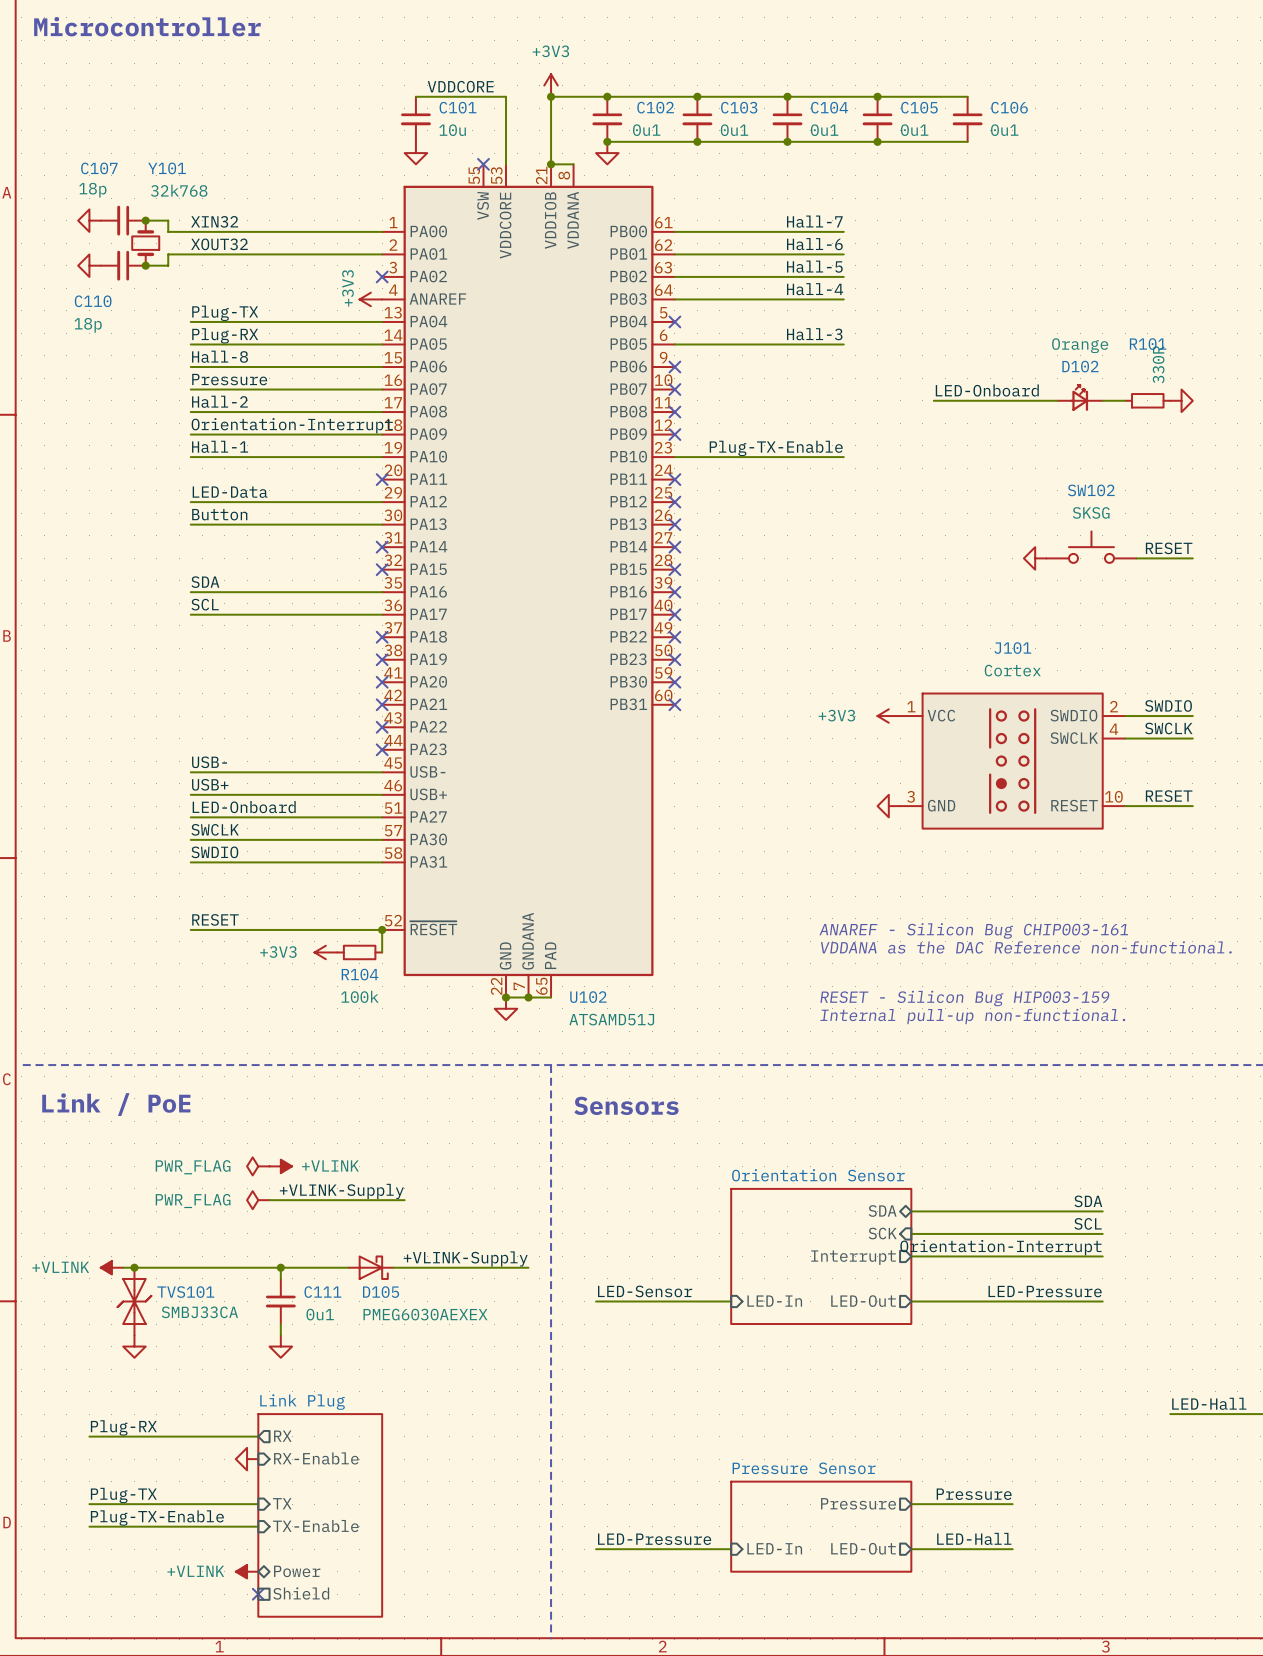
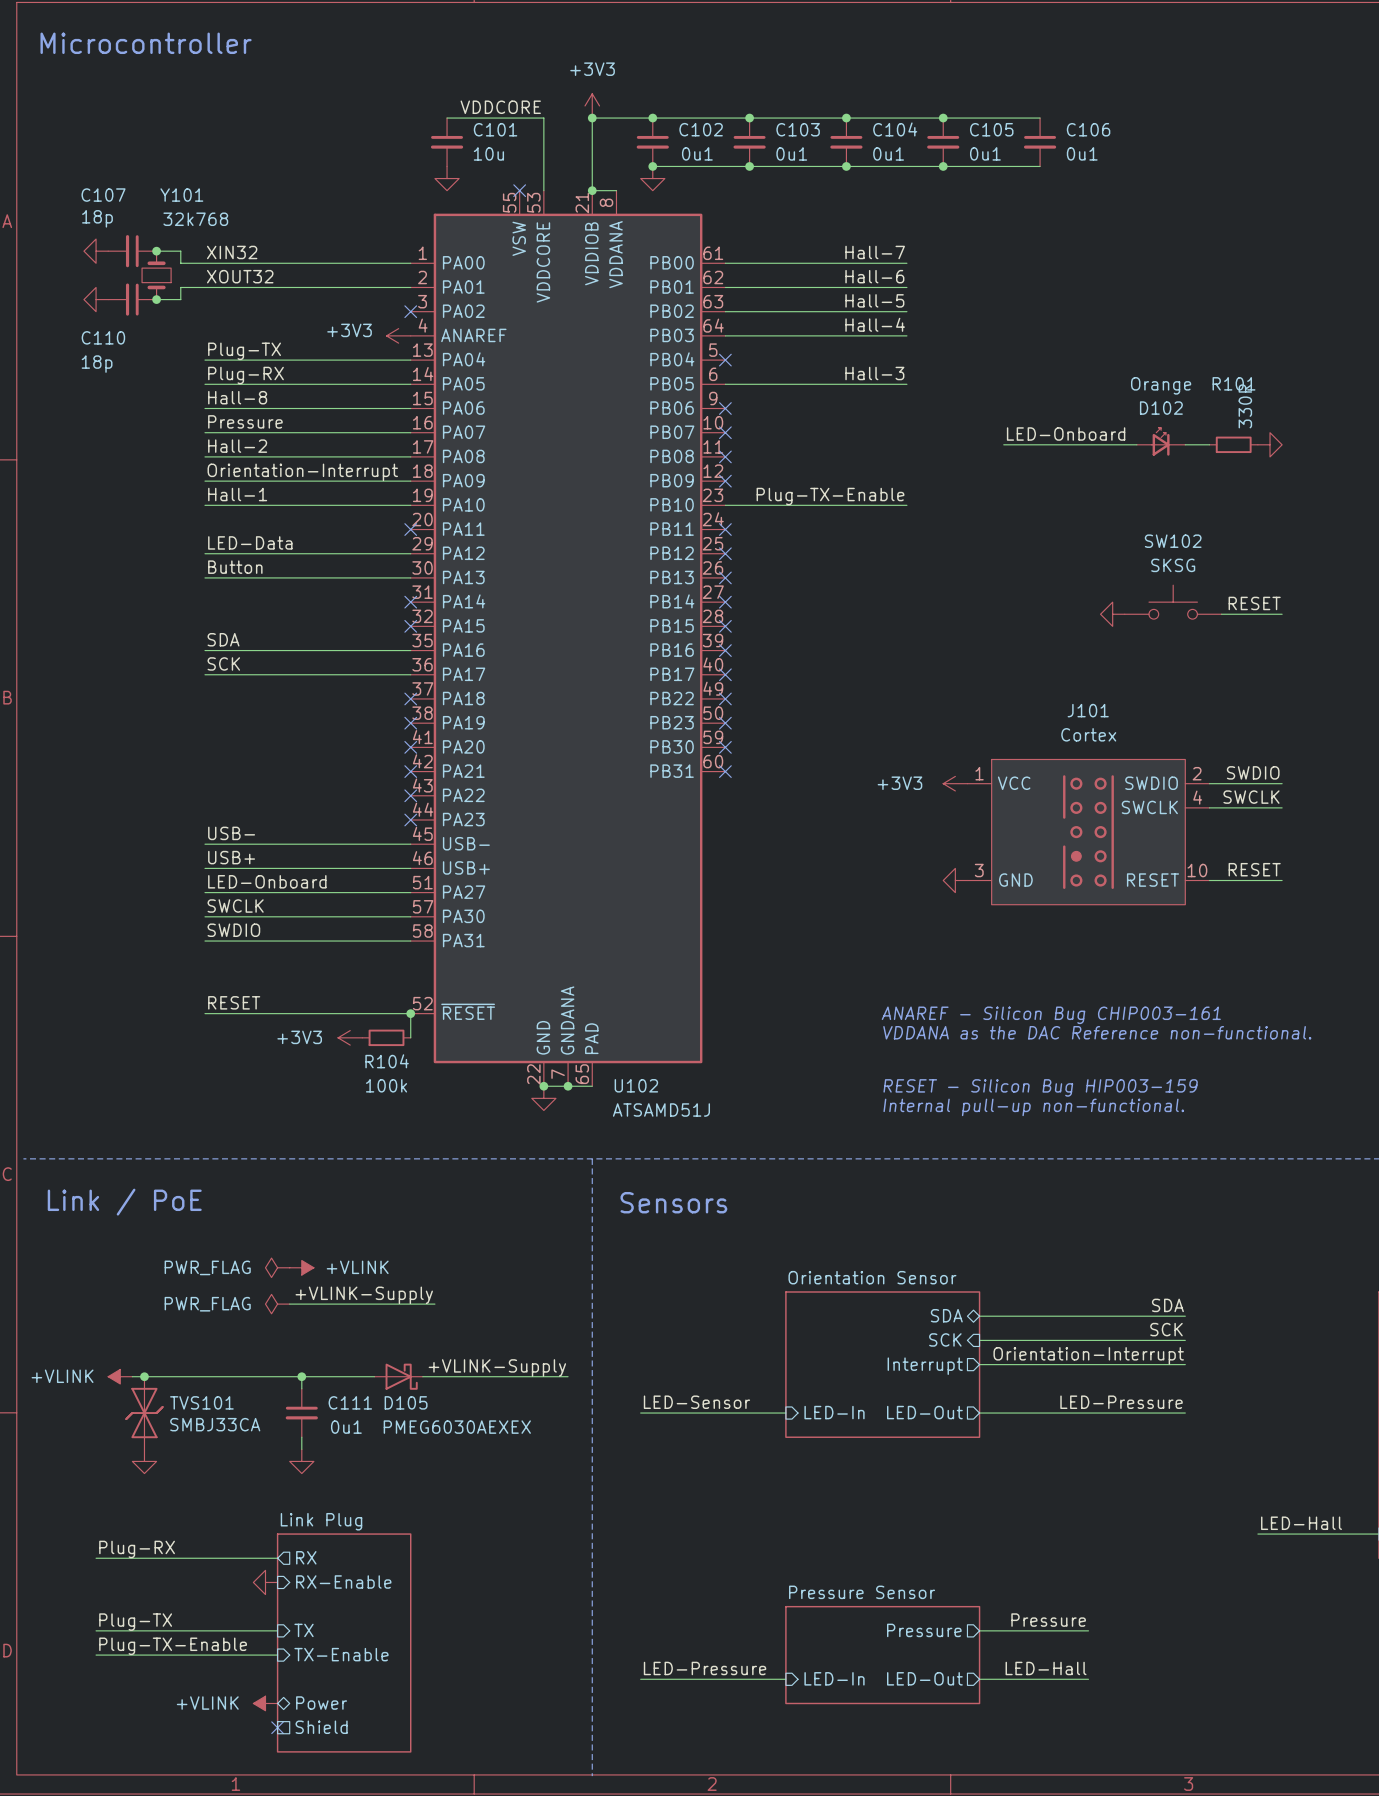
power symbol text rotation: 0° (347, 288) -> 90° clockwise (349, 330)
label: SCL (205, 604) -> SCK (223, 663)
label: SCL (1088, 1223) -> SCK (1166, 1329)

